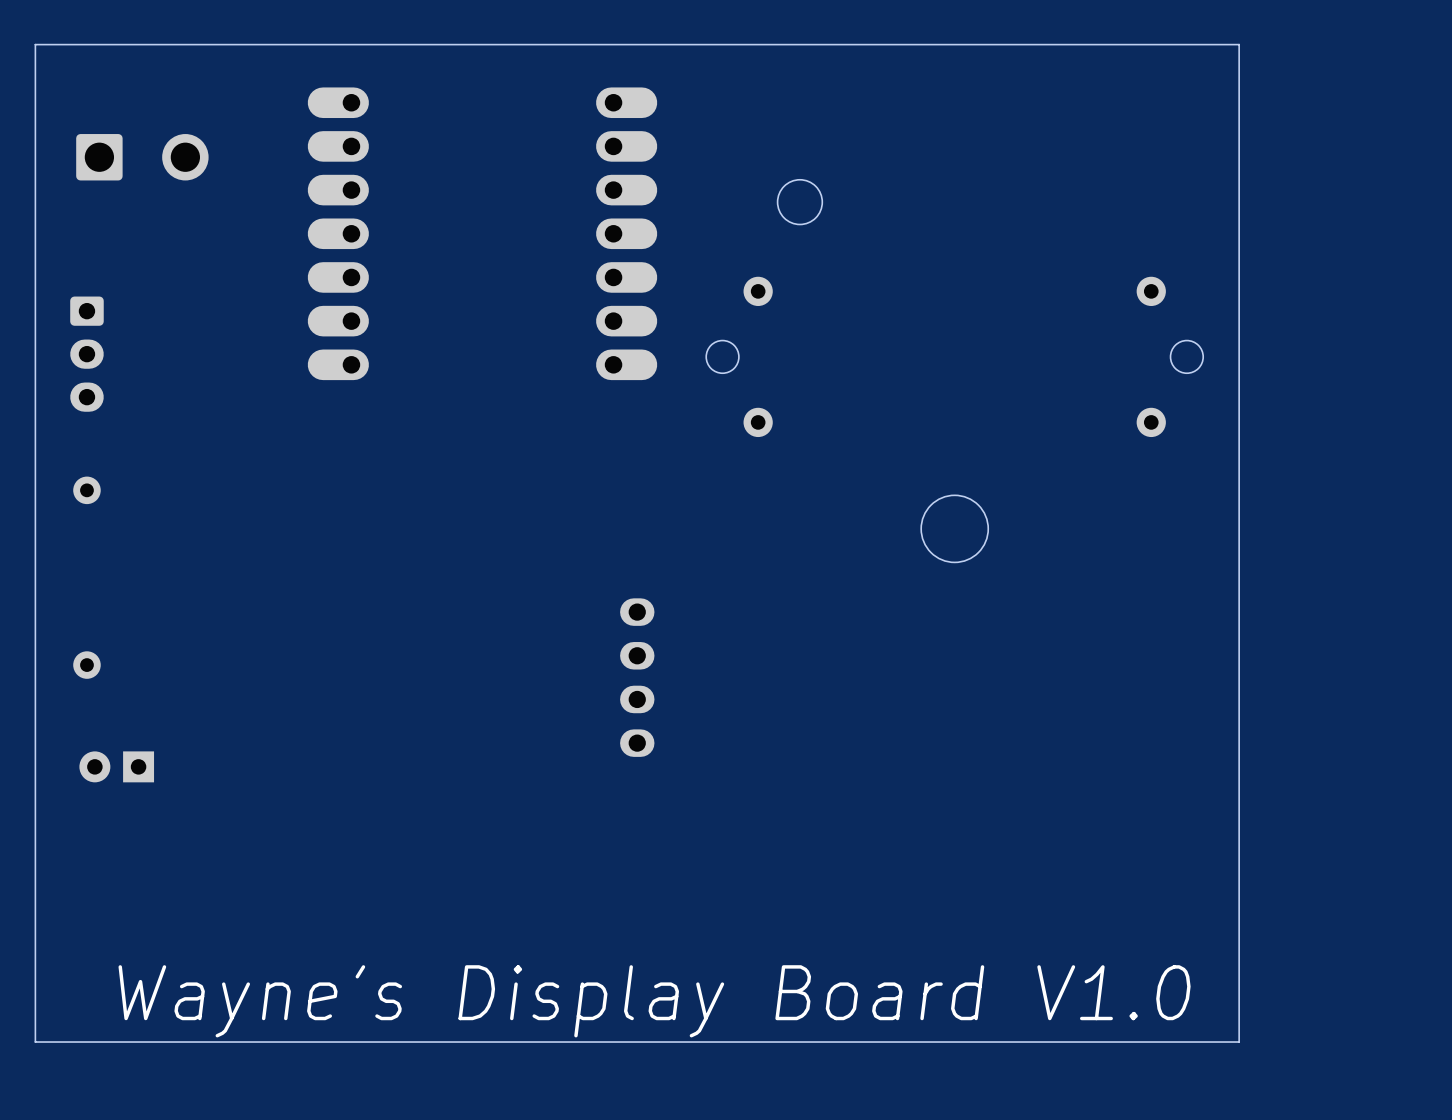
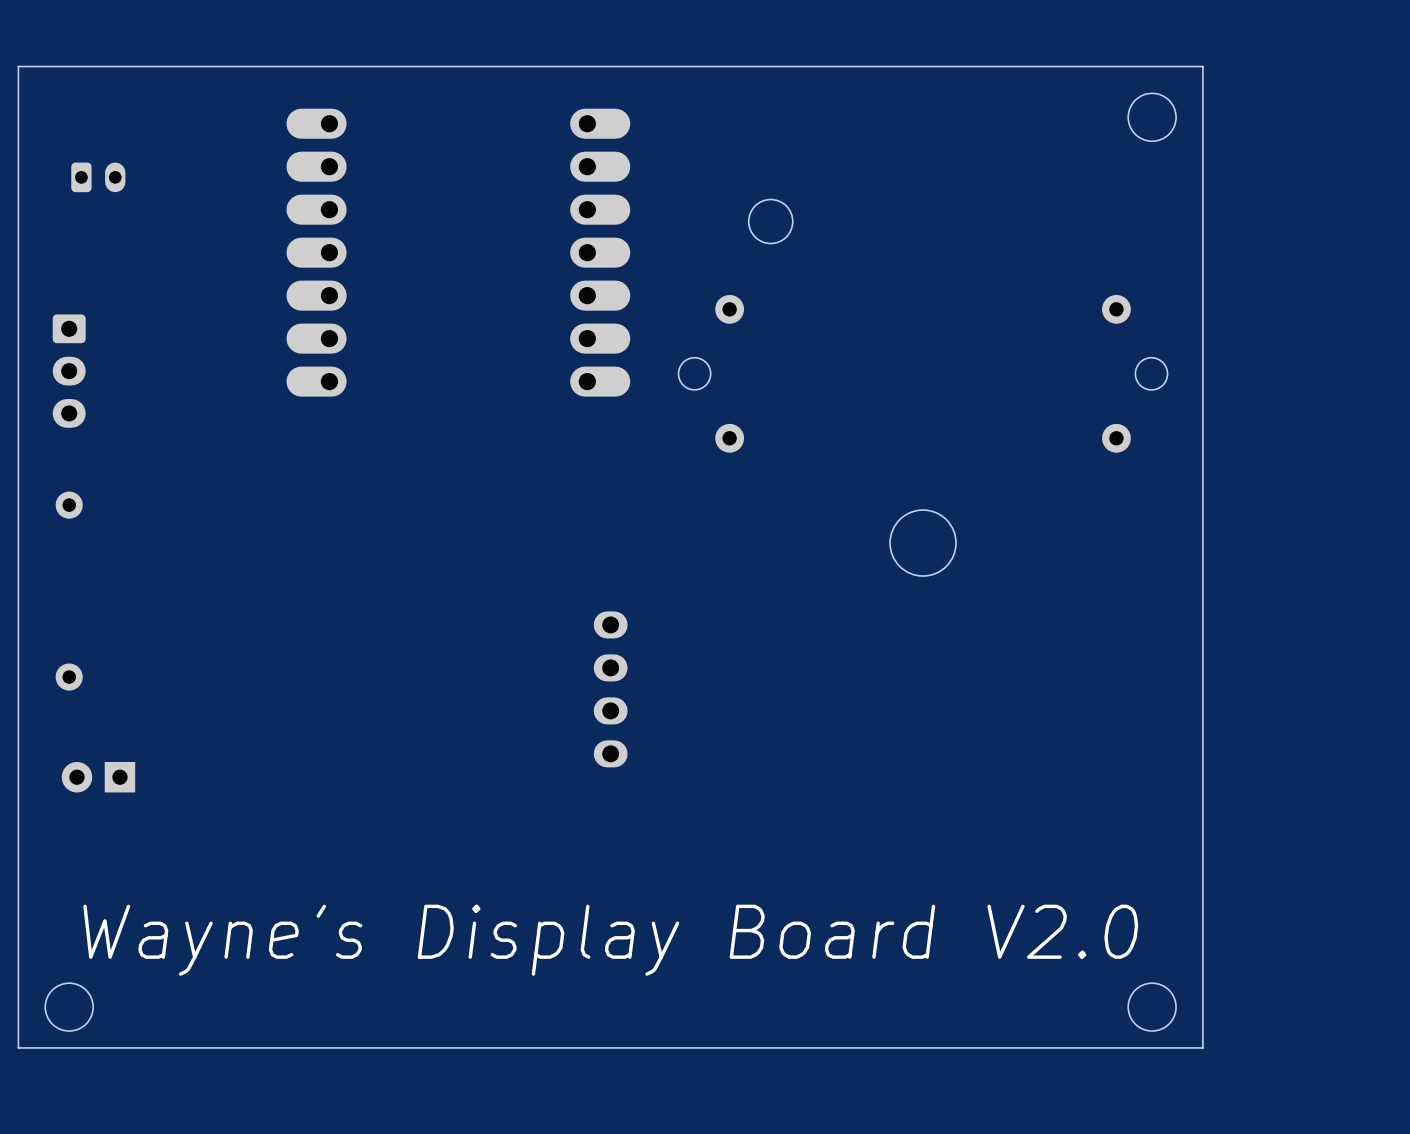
round board edge: none -> [1127, 92, 1177, 142]
part: none -> (98, 177)
part: (142, 157) -> none
round board edge: none -> [44, 982, 94, 1032]
round board edge: none -> [1127, 982, 1177, 1032]
text: Wayne's Display Board V1.0 (654, 1001) -> Wayne's Display Board V2.0 (610, 940)

